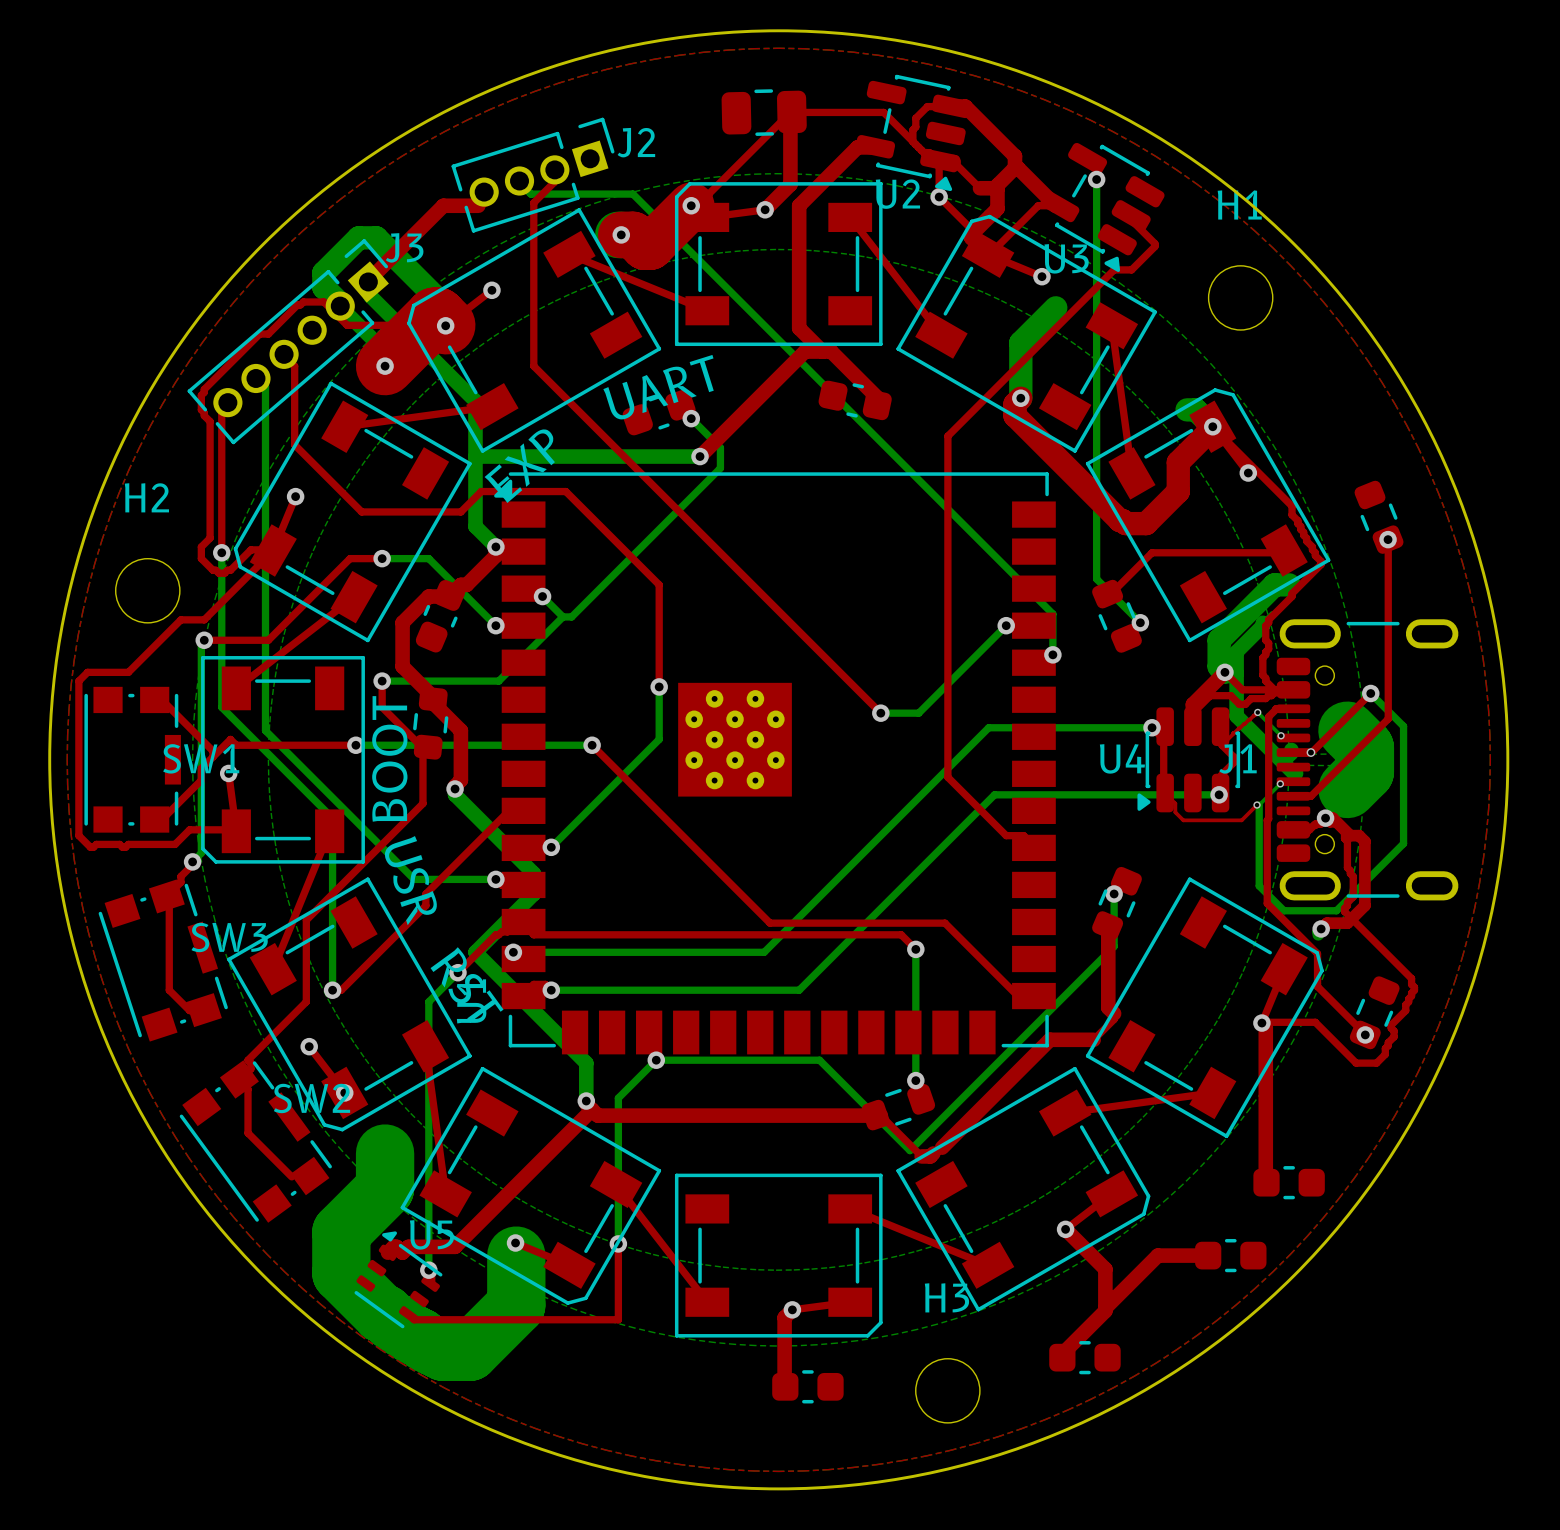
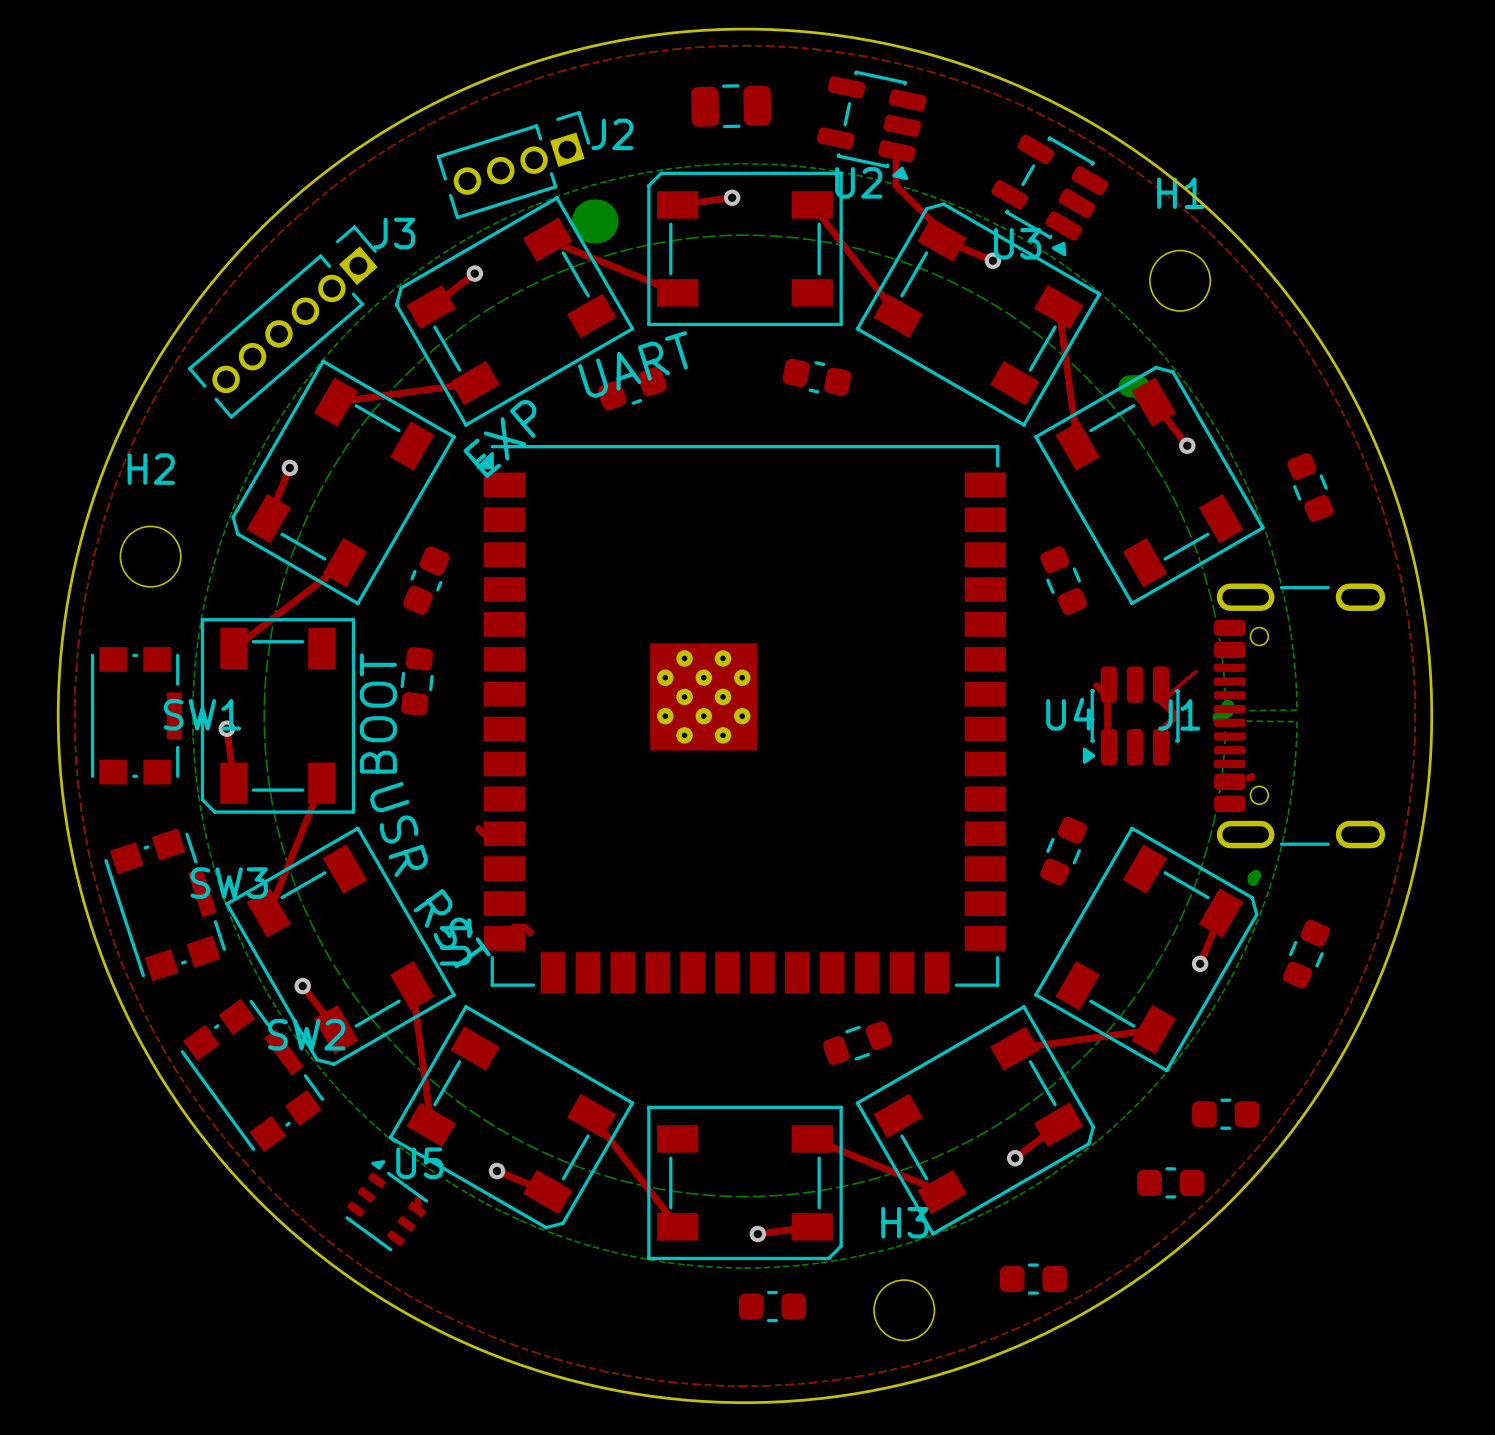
top track: (950, 106) (927, 106) (915, 118) (912, 141) -> none
top track: (950, 106) (965, 106) (1014, 156) (1014, 167) -> none
top track: (790, 112) (883, 112) (924, 153) (930, 153) (939, 162) -> none
top track: (790, 112) (708, 194) (707, 217) -> none
top track: (790, 112) (790, 184) (765, 209) -> none
top track: (875, 146) (857, 147) (799, 205) (799, 328) (822, 351) -> none
top track: (939, 162) (953, 162) (979, 188) (997, 188) -> none
top track: (1014, 167) (1017, 167) (1055, 205) (1058, 205) -> none
top track: (1014, 167) (997, 185) (997, 208) (971, 234) (971, 237) (988, 255) (1038, 205) (1058, 205) -> none
top track: (554, 170) (554, 182) (533, 202) (533, 366) (880, 713) -> none
bottom track: (1096, 179) (1096, 579) (1140, 622) -> none
via: (1096, 179) -> none
bottom track: (519, 182) (530, 194) (632, 194) (1052, 614) (1052, 654) -> none
via: (939, 197) -> none
top track: (478, 205) (443, 205) (367, 281) -> none
top track: (691, 205) (650, 246) (644, 246) (632, 234) (621, 234) -> none
via: (691, 205) -> none
top track: (1131, 215) (1131, 220) (1154, 243) (1154, 246) (1131, 269) (1114, 269) (947, 436) (947, 777) (1006, 835) (1023, 835) (1035, 847) (1033, 847) -> none
via: (621, 234) -> none
bottom track: (370, 284) (370, 296) (475, 401) (475, 526) (495, 546) -> none
bottom track: (341, 304) (323, 287) (323, 272) (358, 237) (376, 237) (443, 304) (443, 307) -> none
bottom track: (341, 304) (341, 307) (376, 343) -> none
bottom track: (1055, 307) (1020, 342) (1020, 398) -> none
via: (445, 325) -> none
top track: (283, 354) (294, 366) (294, 444) (361, 511) (460, 511) (481, 491) (565, 491) (659, 584) (659, 686) -> none
top track: (385, 366) (434, 316) (437, 316) (446, 325) (347, 325) (323, 301) (303, 301) (297, 304) (268, 334) (259, 334) (204, 389) (201, 395) (201, 409) (210, 421) (210, 538) (201, 546) (201, 558) (213, 570) (224, 573) (230, 570) (250, 549) (274, 549) (204, 619) (180, 619) (128, 672) (87, 672) (78, 681) (78, 835) (90, 847) (96, 844) (119, 844) (122, 847) (128, 844) (175, 844) (189, 829) (236, 831) -> none
via: (385, 366) -> none
bottom track: (256, 377) (265, 386) (265, 730) (414, 879) (495, 879) -> none
top track: (1020, 398) (1014, 404) (1014, 415) (1119, 520) (1125, 523) (1146, 523) (1178, 491) (1178, 462) (1213, 427) (1292, 506) (1292, 514) (1297, 520) (1306, 541) (1312, 546) (1321, 564) (1292, 593) (1292, 596) (1268, 619) (1265, 625) (1265, 640) (1268, 643) (1268, 649) (1262, 657) (1262, 675) (1274, 689) -> none
via: (1020, 398) -> none
top track: (877, 405) (877, 398) (831, 351) (805, 351) (700, 456) -> none
top track: (227, 406) (221, 412) (221, 552) -> none
bottom track: (691, 418) (720, 447) (720, 468) (571, 616) (562, 616) -> none
via: (691, 418) -> none
via: (1212, 426) -> none
bottom track: (475, 456) (700, 456) -> none
via: (700, 456) -> none
top track: (1388, 539) (1388, 719) (1310, 796) (1293, 796) -> none
via: (1388, 539) -> none
top track: (495, 546) (495, 555) (466, 584) (460, 584) (449, 596) -> none
via: (495, 546) -> none
top track: (1284, 550) (1280, 552) (1152, 552) (1111, 593) (1107, 594) -> none
bottom track: (221, 552) (221, 707) (332, 818) (332, 990) -> none
via: (221, 552) -> none
top track: (382, 558) (350, 558) (268, 640) (204, 640) -> none
bottom track: (382, 558) (428, 558) (495, 625) -> none
via: (382, 558) -> none
bottom track: (1289, 584) (1274, 584) (1219, 640) (1219, 666) (1224, 672) (1236, 673) -> none
top track: (449, 596) (428, 596) (402, 622) (402, 666) (434, 698) -> none
bottom track: (542, 596) (562, 616) -> none
via: (542, 596) -> none
bottom track: (1272, 614) (1236, 651) (1236, 716) (1294, 774) (1296, 773) -> none
bottom track: (562, 616) (498, 681) (382, 681) -> none
via: (1140, 622) -> none
via: (495, 625) -> none
bottom track: (1006, 625) (918, 713) (880, 713) -> none
via: (1006, 625) -> none
via: (204, 640) -> none
bottom track: (201, 643) (201, 853) (192, 861) -> none
via: (1052, 654) -> none
via: (1224, 672) -> none
top track: (382, 681) (382, 707) (422, 748) -> none
via: (382, 681) -> none
bottom track: (659, 686) (659, 739) (551, 847) -> none
via: (659, 686) -> none
top track: (1292, 689) (1289, 692) (1274, 692) (1265, 698) (1251, 698) (1245, 704) (1239, 704) (1230, 695) (1210, 695) (1192, 713) (1192, 727) (1192, 704) (1224, 672) (1242, 689) (1293, 689) -> none
top track: (1370, 693) (1311, 752) -> none
bottom track: (1370, 693) (1403, 726) (1403, 843) (1336, 910) (1284, 910) (1259, 885) (1259, 805) -> none
via: (1370, 693) -> none
top track: (434, 698) (434, 704) (460, 730) (460, 780) (455, 786) -> none
top track: (154, 699) (160, 698) (213, 751) (213, 756) -> none
top track: (1293, 708) (1275, 708) (1268, 716) (1267, 903) (1317, 953) (1317, 986) (1365, 1034) -> none
bottom track: (1257, 712) (1281, 735) -> none
via: (1257, 712) -> none
via: (880, 713) -> none
bottom track: (1152, 727) (988, 727) (764, 952) (513, 952) -> none
via: (1152, 727) -> none
bottom track: (1347, 730) (1364, 748) (1364, 771) (1347, 789) -> none
via: (1281, 735) -> none
top track: (355, 745) (236, 745) (230, 739) (201, 768) (201, 780) (166, 815) (154, 819) -> none
bottom track: (355, 745) (592, 745) -> none
via: (355, 745) -> none
top track: (592, 745) (770, 923) (944, 923) (1017, 996) (1035, 996) -> none
via: (592, 745) -> none
top track: (422, 748) (422, 803) (306, 920) (306, 1001) (248, 1060) (250, 1063) (250, 1068) (239, 1080) -> none
via: (1310, 752) -> none
bottom track: (1280, 783) (1259, 805) -> none
via: (1280, 783) -> none
bottom track: (455, 789) (455, 794) (533, 873) (533, 893) (475, 952) (586, 1063) (586, 1101) -> none
via: (455, 789) -> none
top track: (1165, 793) (1175, 803) (1175, 812) (1183, 820) (1241, 820) (1257, 805) -> none
bottom track: (1219, 794) (994, 794) (799, 990) (551, 990) -> none
via: (1219, 794) -> none
via: (1257, 805) -> none
top track: (523, 810) (507, 812) (425, 893) (425, 905) (341, 990) (332, 990) -> none
via: (1325, 818) -> none
top track: (1327, 818) (1332, 818) (1350, 835) (1359, 835) (1364, 841) (1364, 905) (1347, 923) (1327, 923) (1321, 928) -> none
top track: (1292, 829) (1309, 829) (1315, 823) (1327, 821) (1329, 823) (1335, 823) (1344, 832) (1344, 838) (1347, 841) (1347, 867) (1353, 876) (1353, 896) (1347, 902) (1344, 911) (1411, 978) (1414, 990) (1405, 1004) (1405, 1010) (1391, 1025) (1394, 1036) (1385, 1048) (1385, 1054) (1376, 1063) (1356, 1063) (1315, 1022) (1261, 1023) (1265, 1026) (1266, 1182) -> none
via: (551, 847) -> none
via: (192, 861) -> none
top track: (192, 864) (180, 876) (180, 882) (166, 896) (169, 899) (169, 990) (189, 1010) (204, 1010) -> none
via: (495, 879) -> none
bottom track: (1114, 893) (1114, 946) (909, 1150) (819, 1060) (656, 1060) (618, 1098) (618, 1243) -> none
via: (1114, 893) -> none
top track: (523, 921) (522, 923) (533, 934) (901, 934) (915, 949) -> none
top track: (1107, 925) (1108, 1007) (1114, 1013) (1114, 1019) (1093, 1039) (1049, 1039) (936, 1153) (930, 1156) (921, 1156) (880, 1115) (597, 1115) (586, 1103) -> none
top track: (527, 928) (510, 928) (507, 931) (495, 934) (457, 972) -> none
via: (1321, 928) -> none
bottom track: (915, 949) (915, 1080) -> none
via: (915, 949) -> none
via: (513, 952) -> none
bottom track: (457, 972) (428, 1001) (428, 1270) -> none
via: (457, 972) -> none
via: (332, 990) -> none
via: (551, 990) -> none
via: (1365, 1034) -> none
via: (656, 1060) -> none
top track: (239, 1080) (248, 1089) (248, 1133) (291, 1176) -> none
via: (915, 1080) -> none
via: (344, 1092) -> none
via: (586, 1101) -> none
top track: (592, 1109) (455, 1246) (408, 1246) (402, 1252) (396, 1246) (393, 1246) (387, 1252) -> none
bottom track: (385, 1153) (385, 1188) (341, 1232) (341, 1273) (382, 1313) (385, 1313) (393, 1322) (396, 1322) (411, 1334) (420, 1337) (425, 1343) (443, 1351) (469, 1351) (516, 1305) (516, 1255) -> none
top track: (1065, 1229) (1105, 1269) (1105, 1311) (1061, 1354) (1062, 1357) -> none
via: (618, 1243) -> none
top track: (618, 1246) (618, 1319) (414, 1319) (408, 1313) -> none
top track: (1208, 1255) (1157, 1255) (1105, 1308) -> none
via: (428, 1270) -> none
top track: (792, 1309) (784, 1317) (785, 1386) -> none

